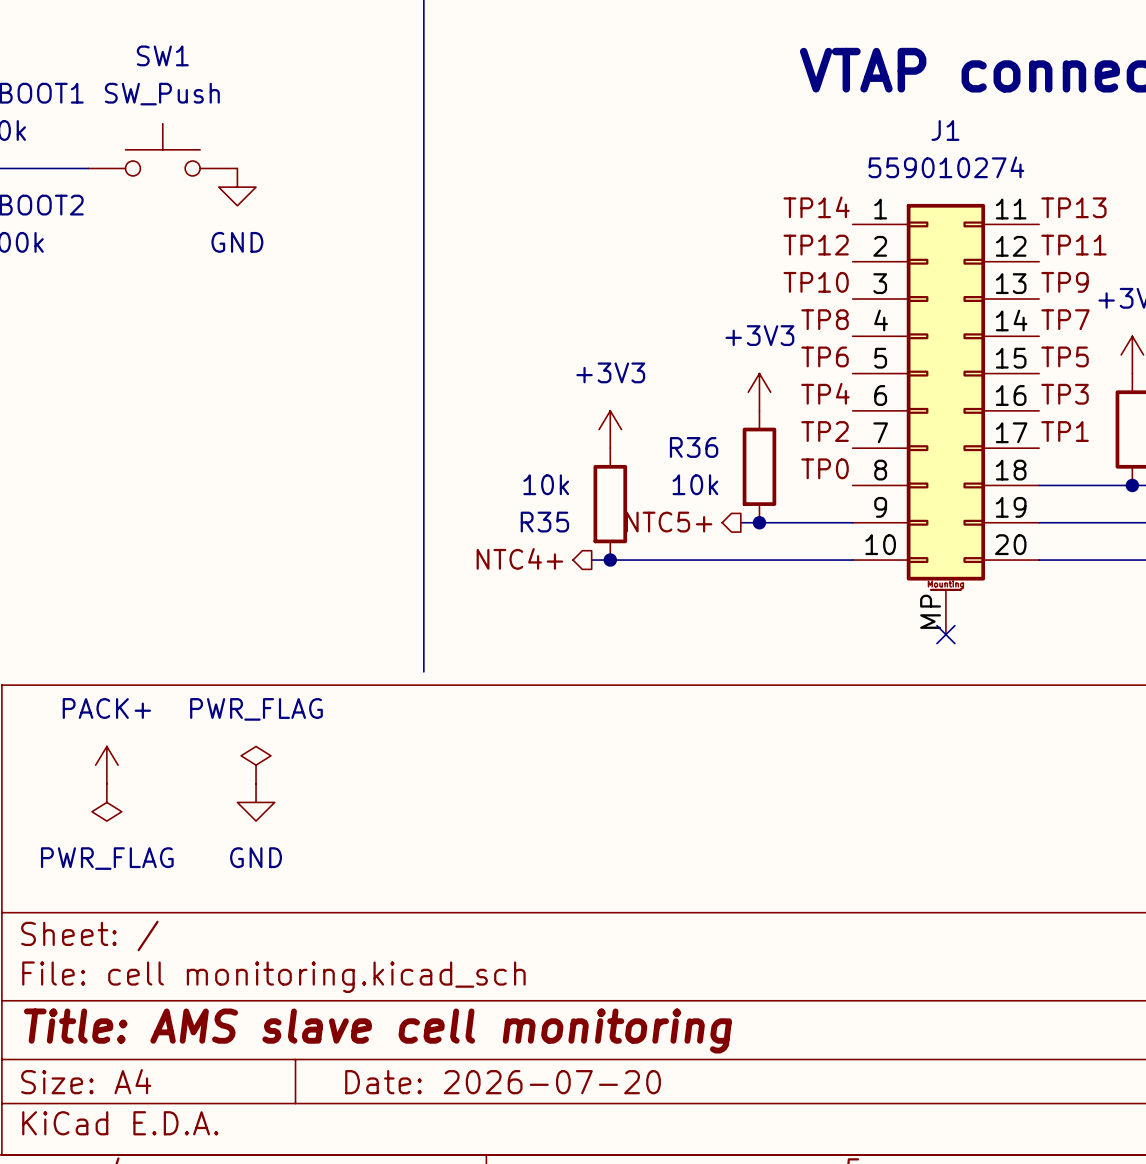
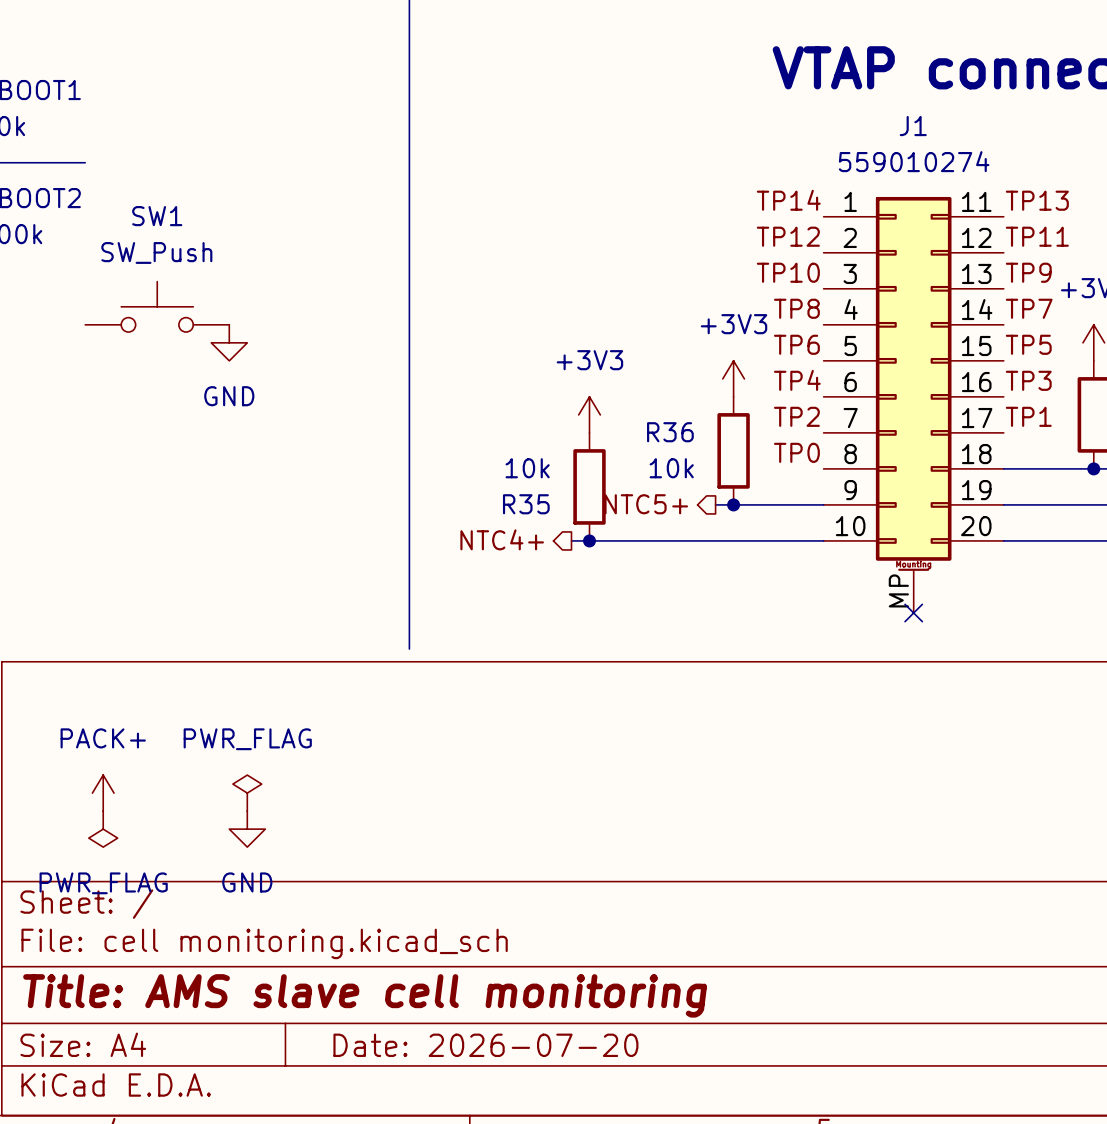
SW1 position: (162, 149) -> (157, 306)
power symbol: GND (237, 187) -> none
power symbol: none -> GND (229, 342)
power symbol position: PACK+ (106, 765) -> PACK+ (103, 793)
power symbol position: PWR_FLAG (256, 765) -> PWR_FLAG (247, 793)
power symbol position: PWR_FLAG (106, 802) -> PWR_FLAG (103, 829)
power symbol position: GND (256, 802) -> GND (247, 829)

